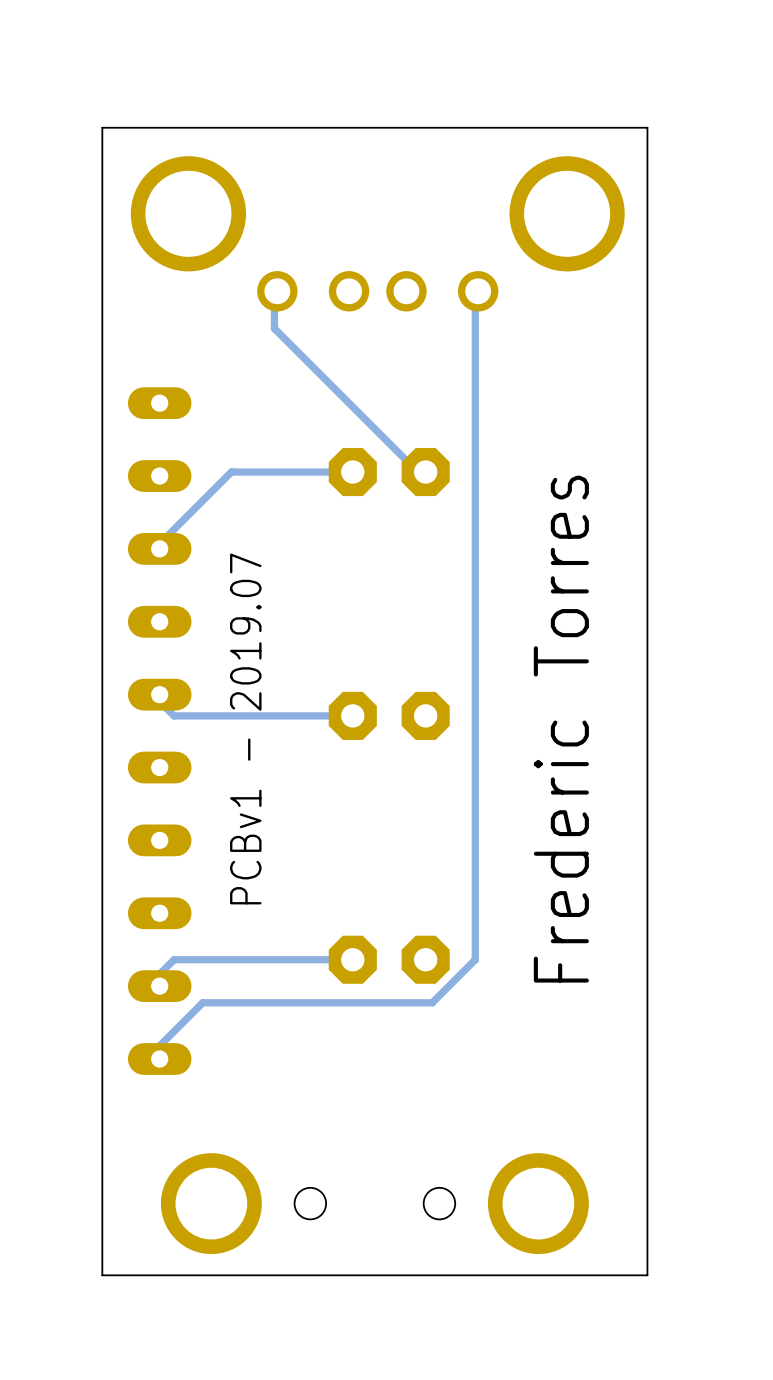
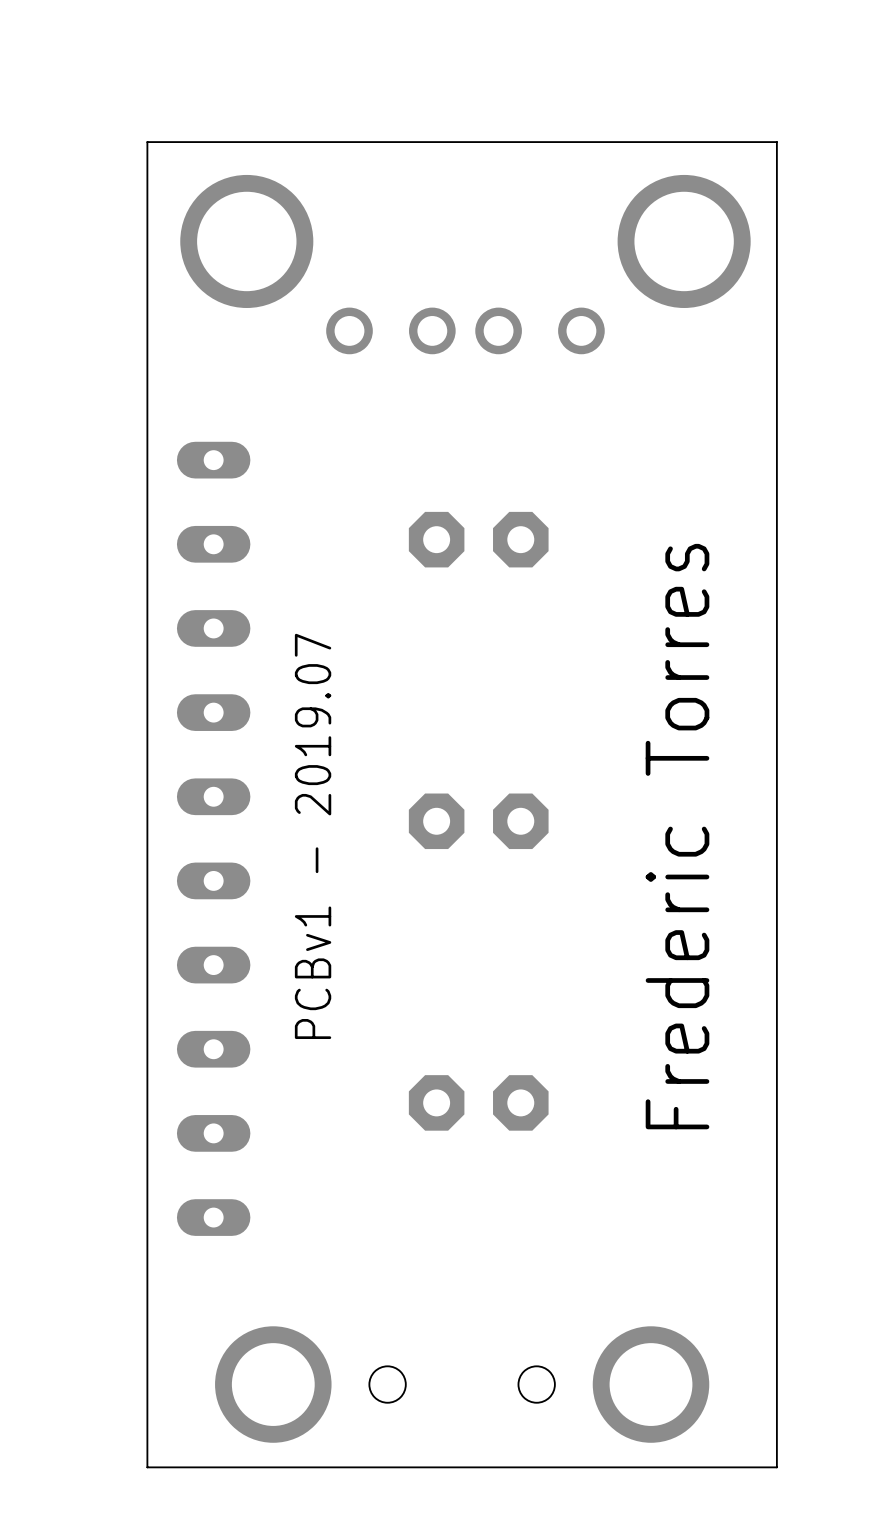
track: (277, 291) (274, 299) (274, 328) (417, 472) (425, 472) -> none
track: (478, 291) (475, 299) (475, 959) (432, 1002) (202, 1002) (159, 1045) (159, 1059) -> none
track: (352, 472) (231, 472) (159, 543) (159, 548) -> none
track: (159, 694) (159, 701) (174, 715) (352, 715) -> none
track: (352, 959) (174, 959) (159, 974) (159, 986) -> none

